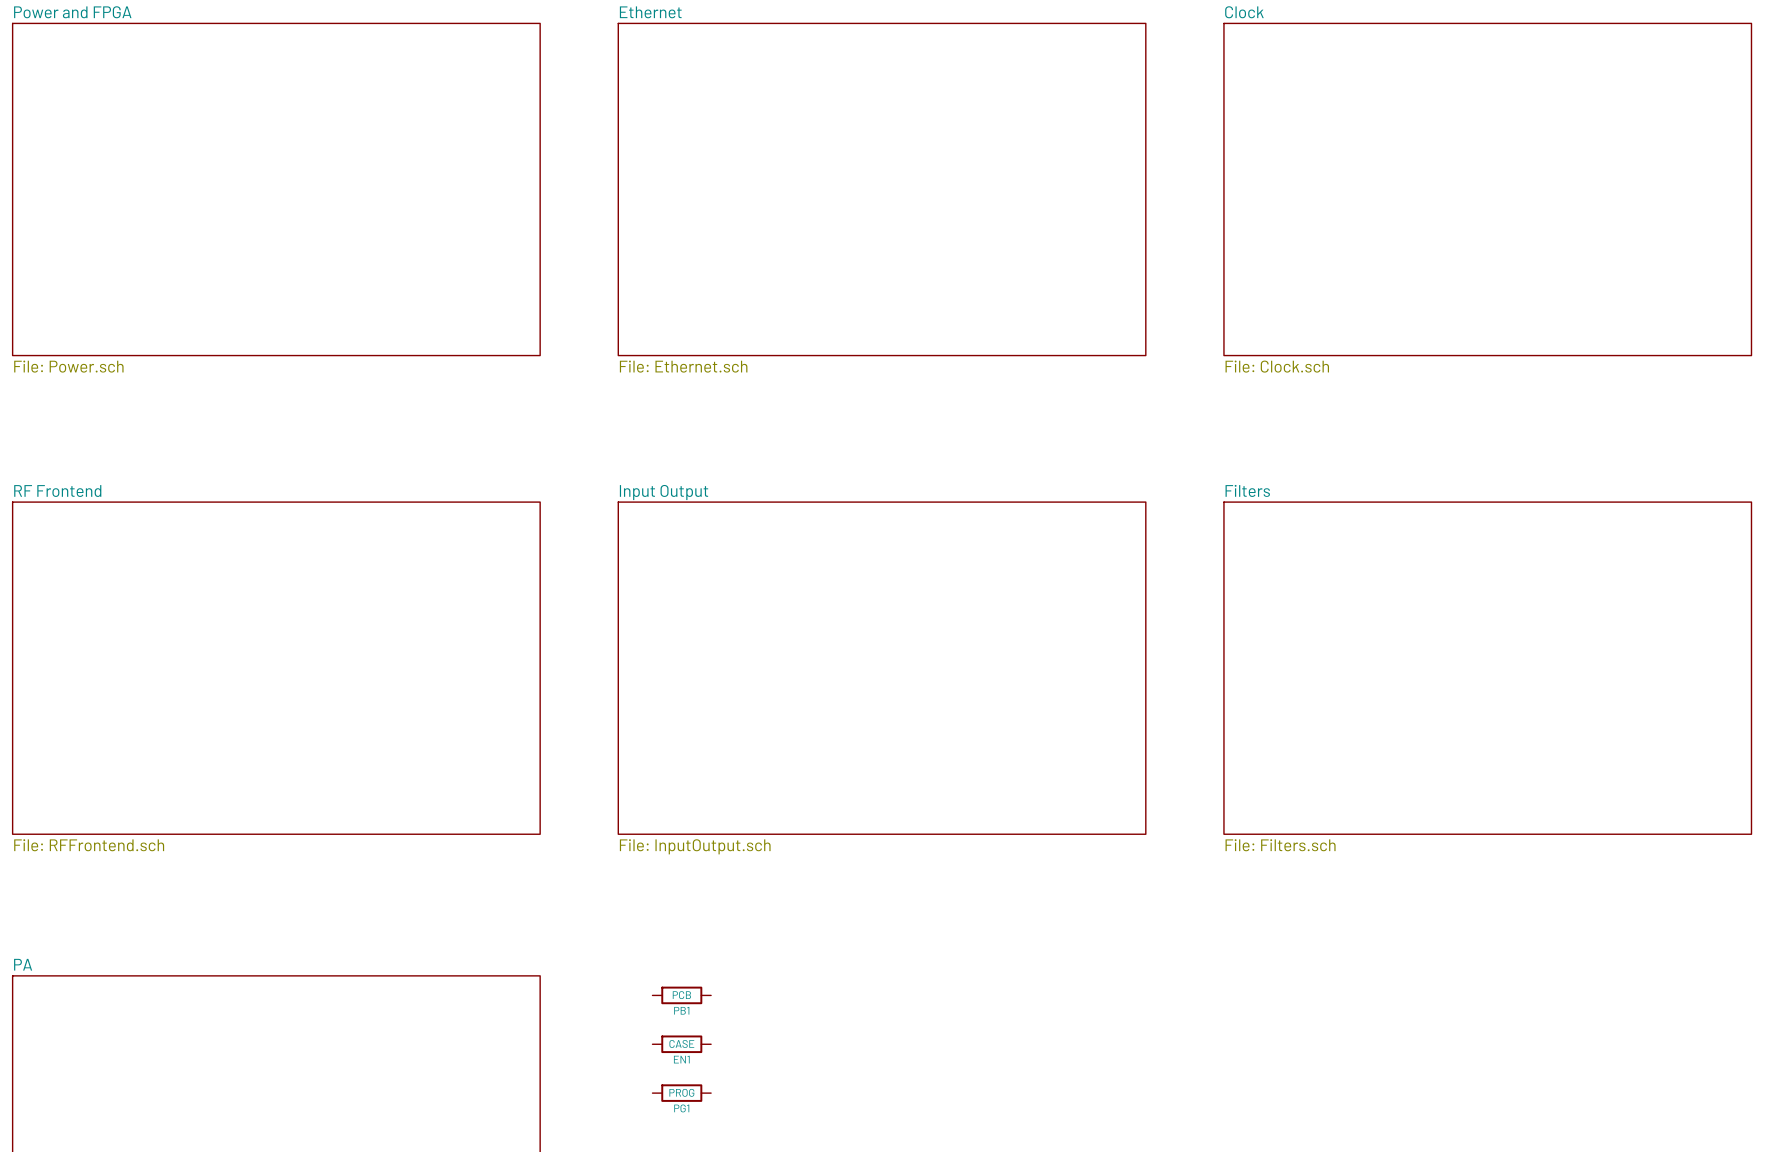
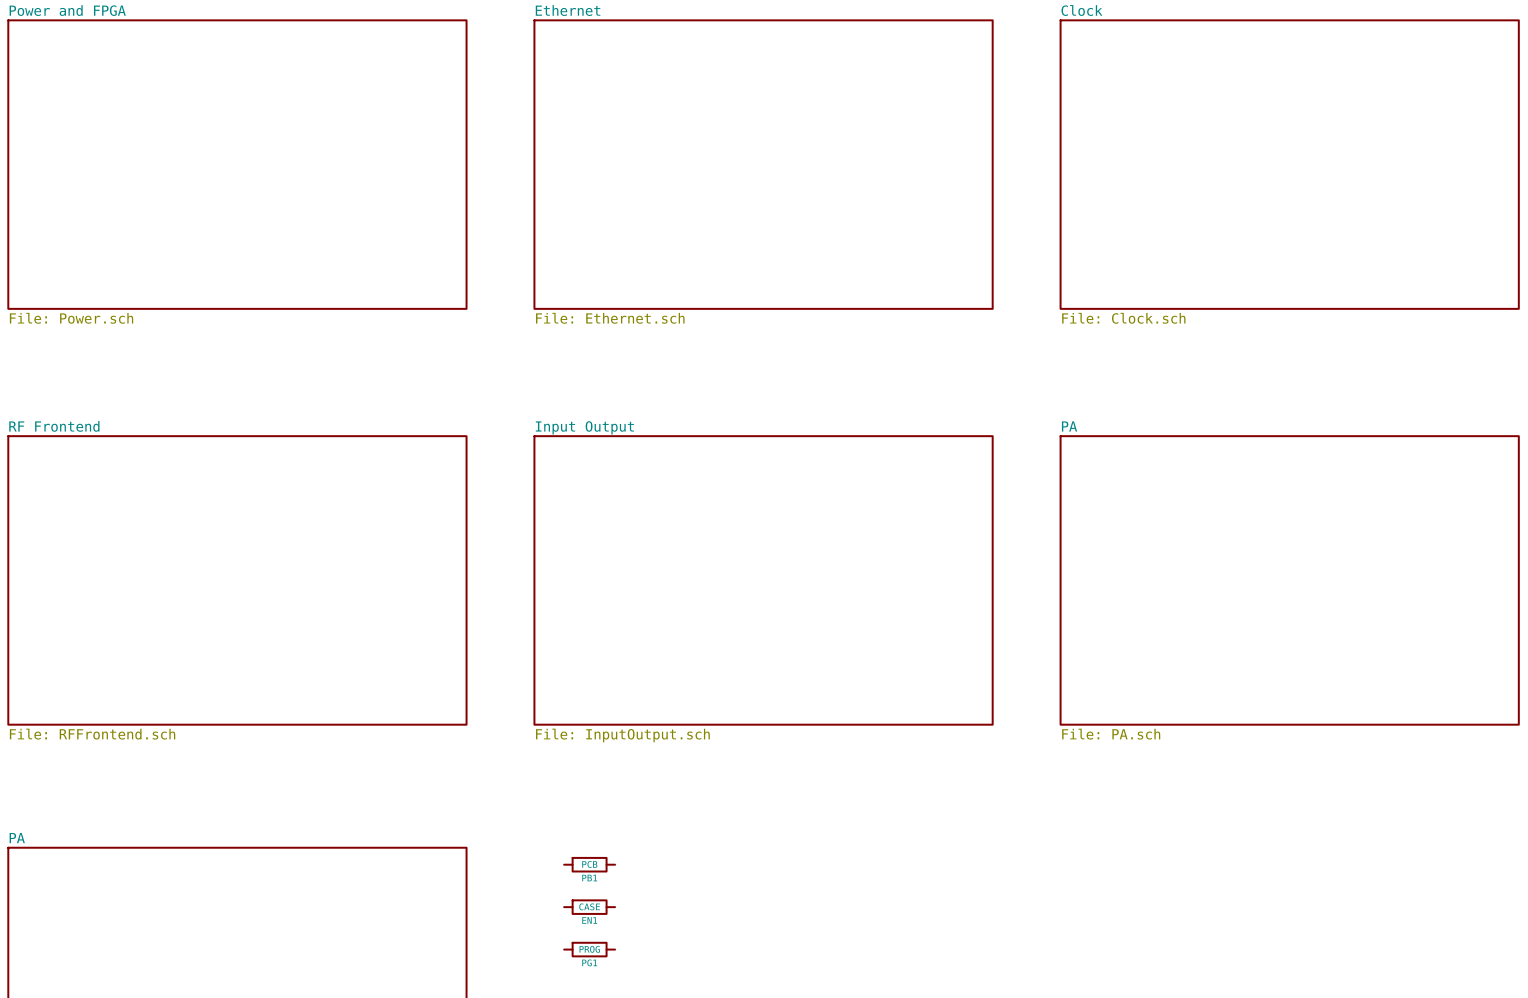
sheet Filters name: Filters (1247, 490) -> PA (1069, 426)
sheet Filters value: File: Filters.sch (1280, 845) -> File: PA.sch (1111, 734)

